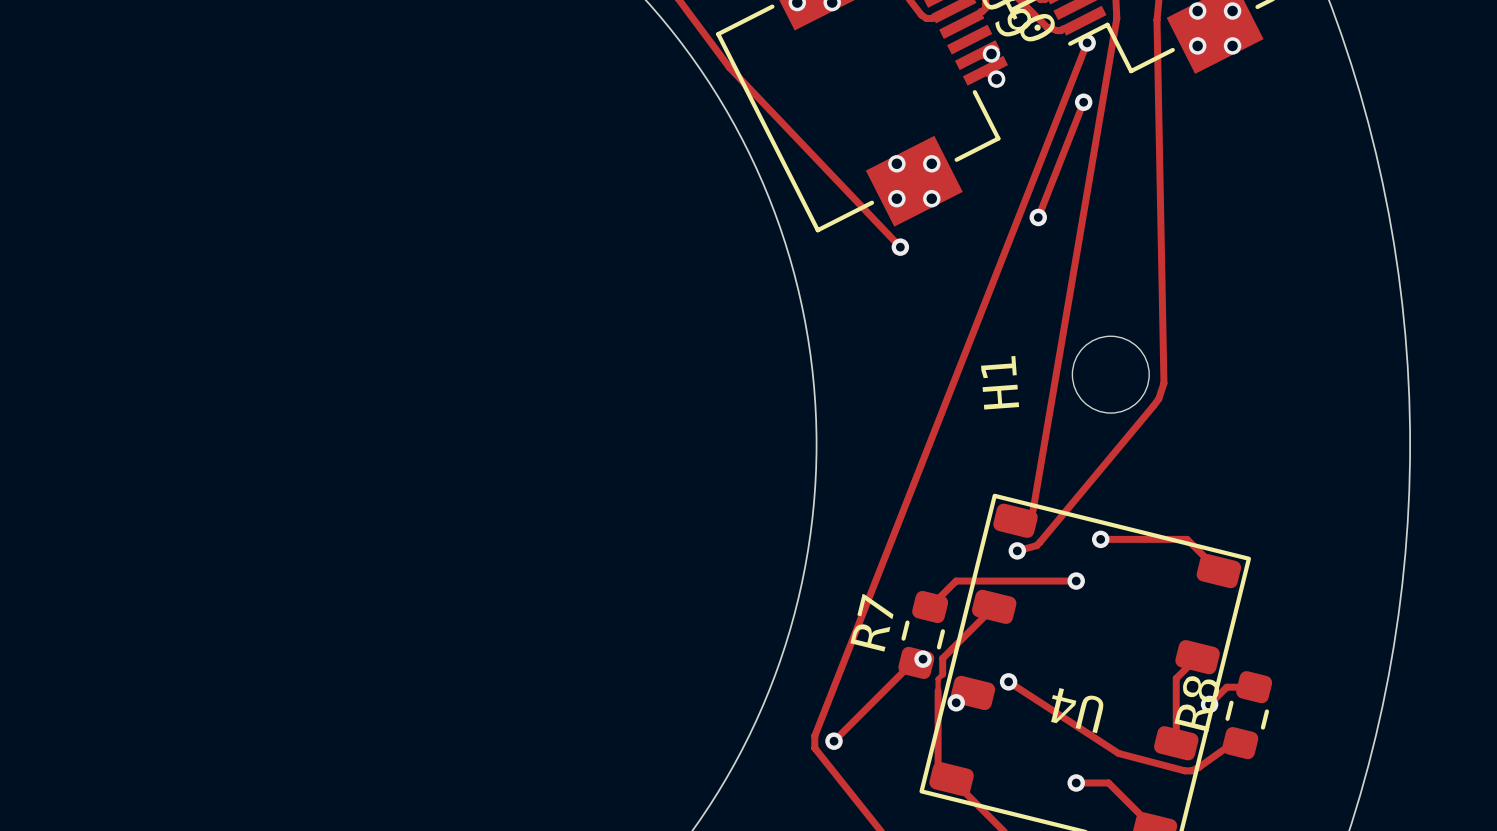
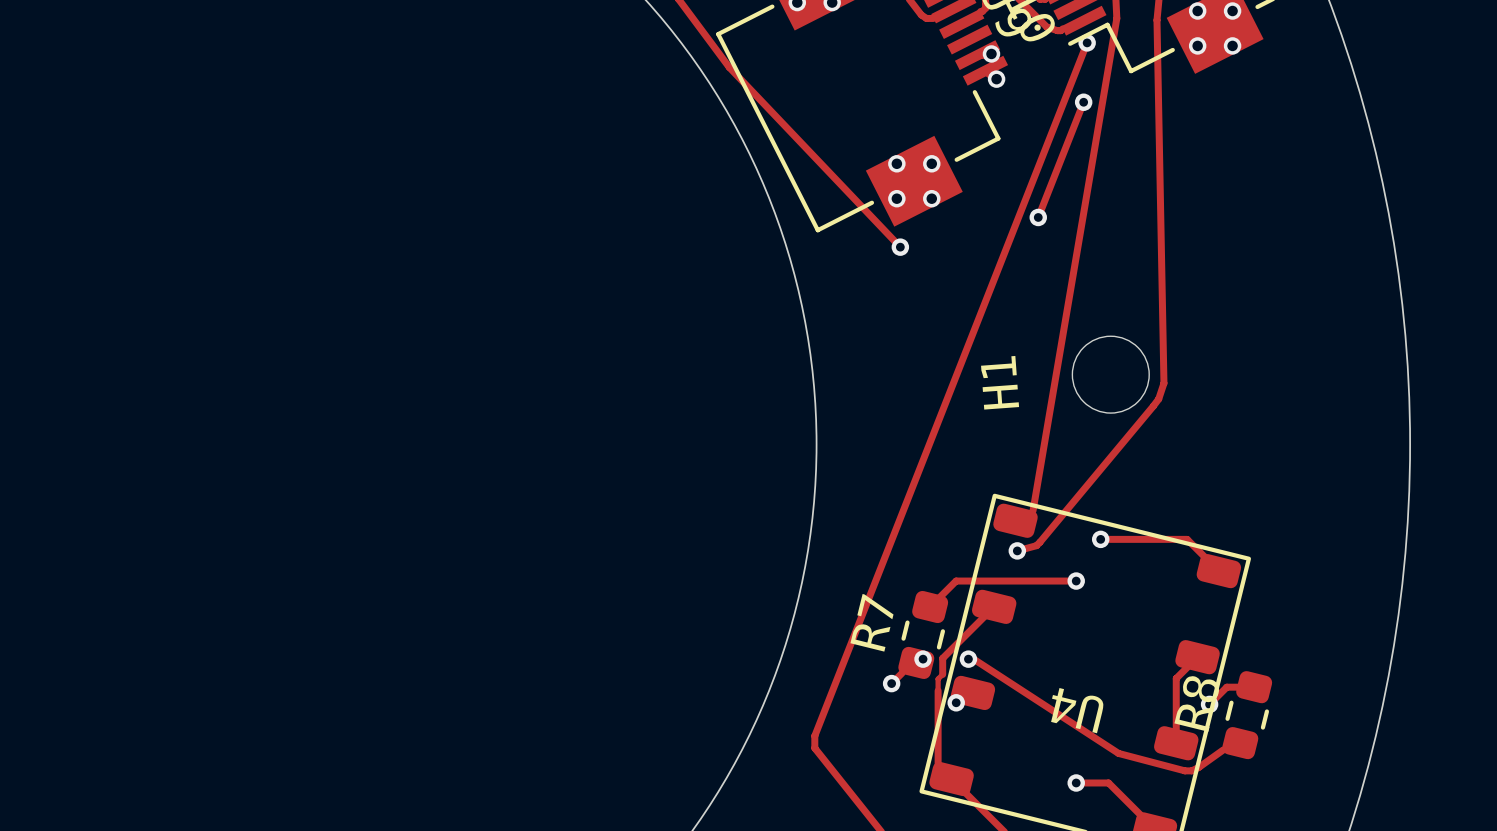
track: (1008, 681) (1118, 753) -> (968, 659) (973, 659) (1118, 753)
via position: (1008, 681) -> (968, 659)
track: (891, 683) (834, 741) -> none
via: none -> (891, 683)
via: (834, 741) -> none

